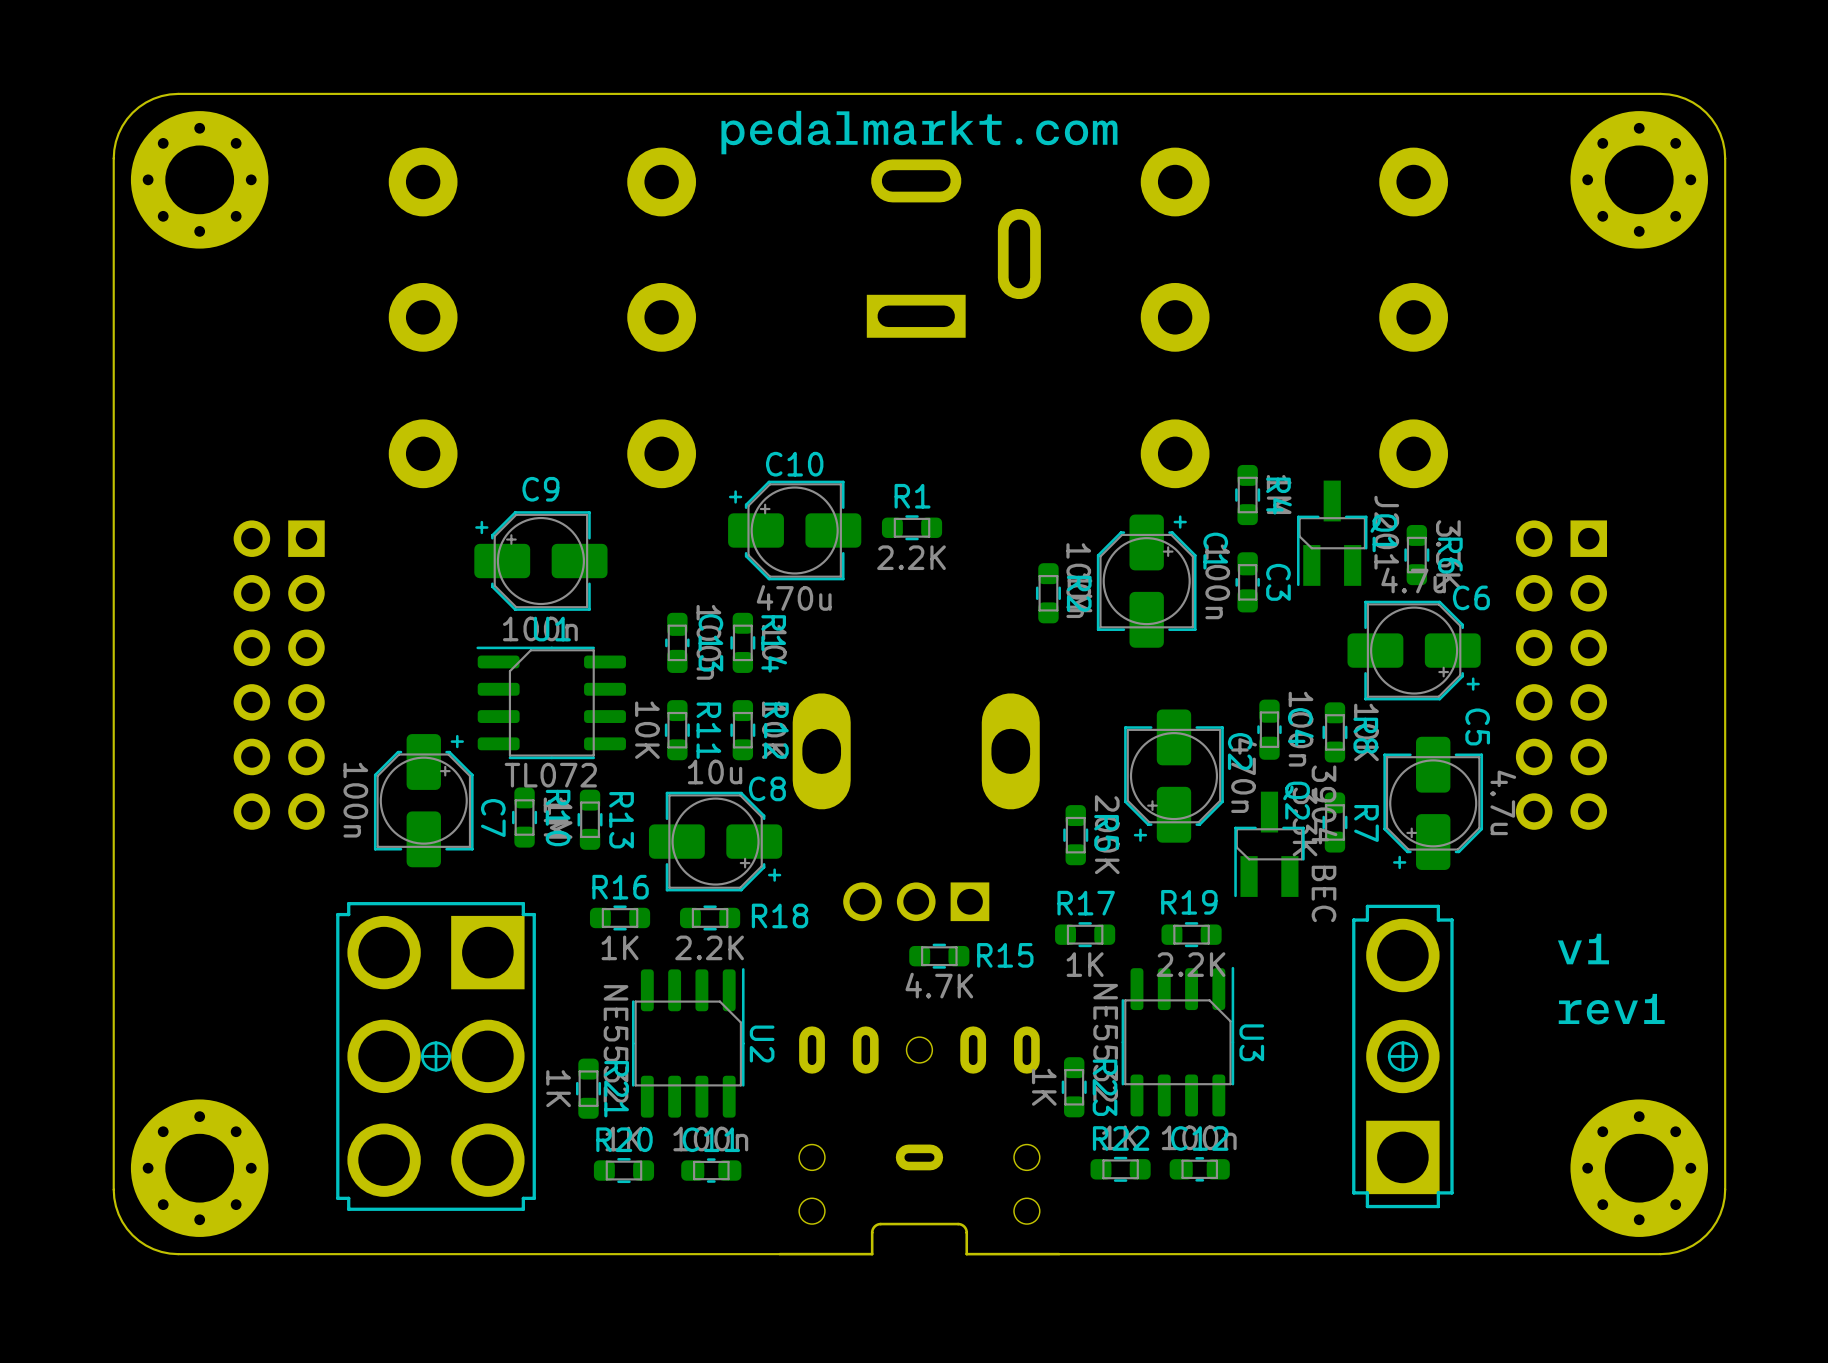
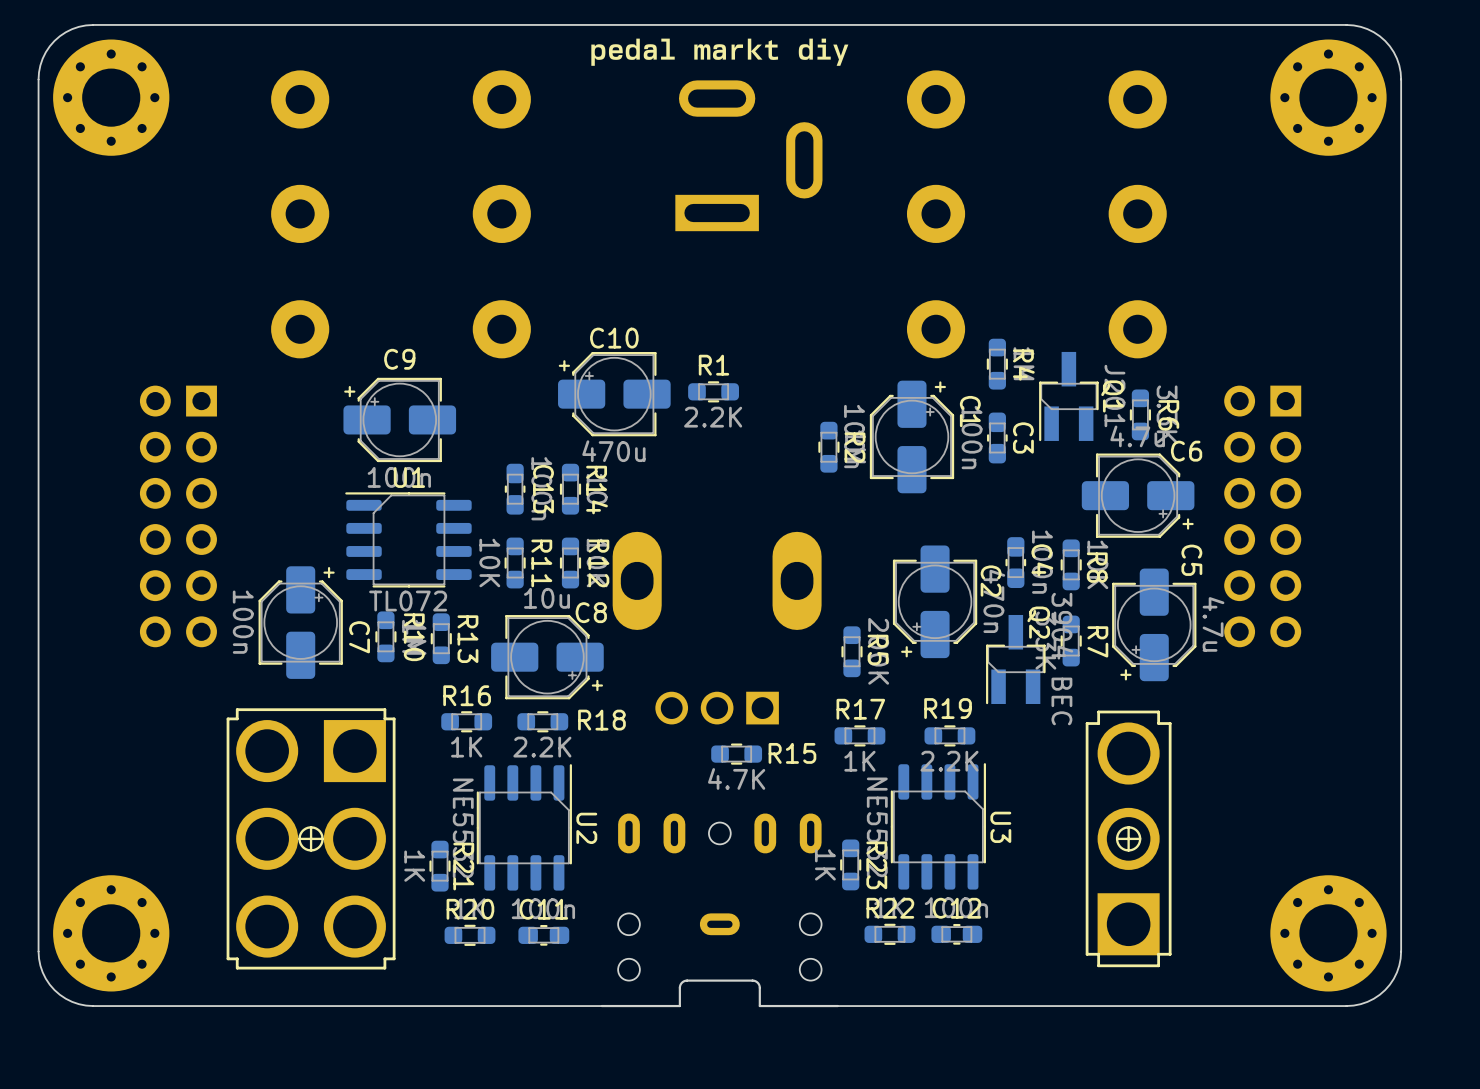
drawing shape: [721, 110, 1118, 155] -> [591, 38, 849, 66]
drawing: [1557, 933, 1665, 1025] -> none

